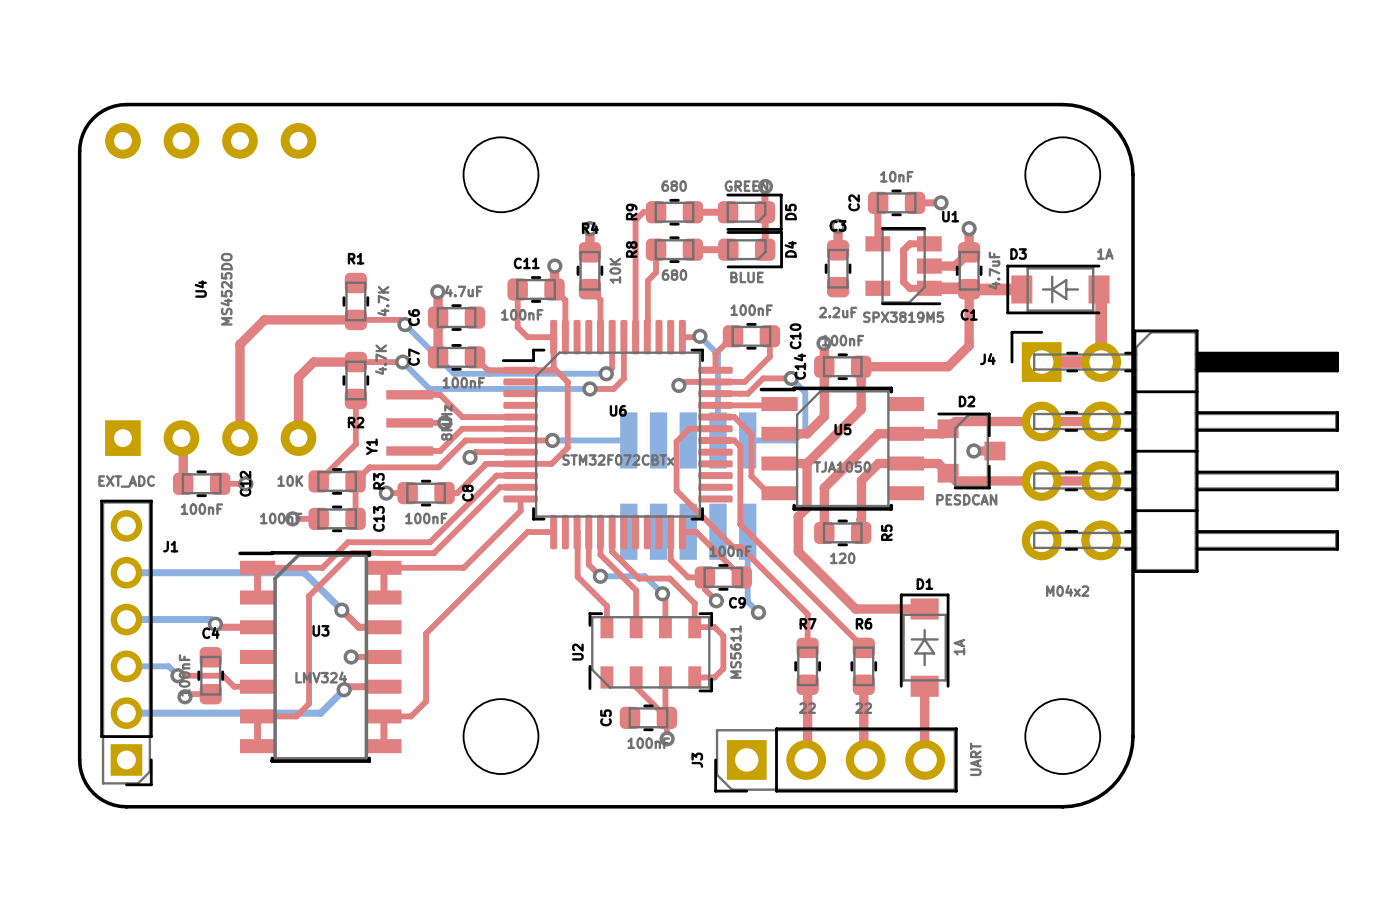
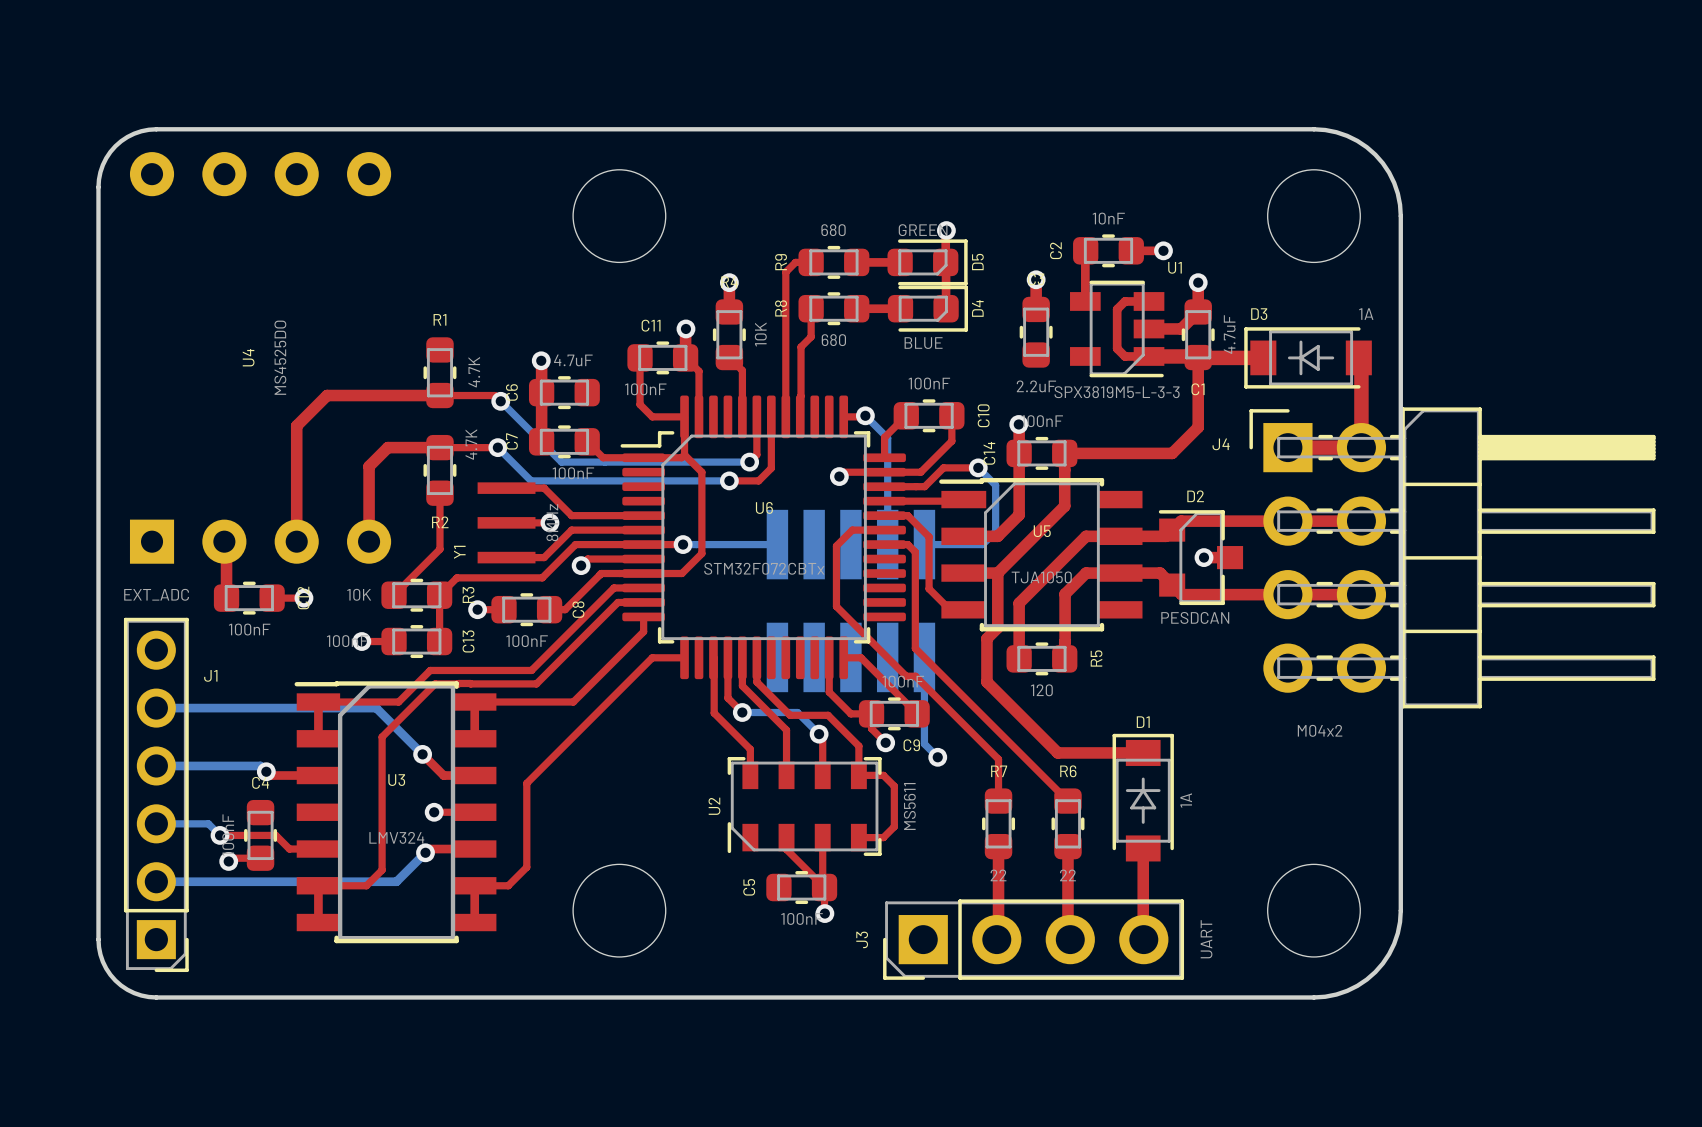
U1 value: SPX3819M5 (903, 317) -> SPX3819M5-L-3-3 (1117, 392)

